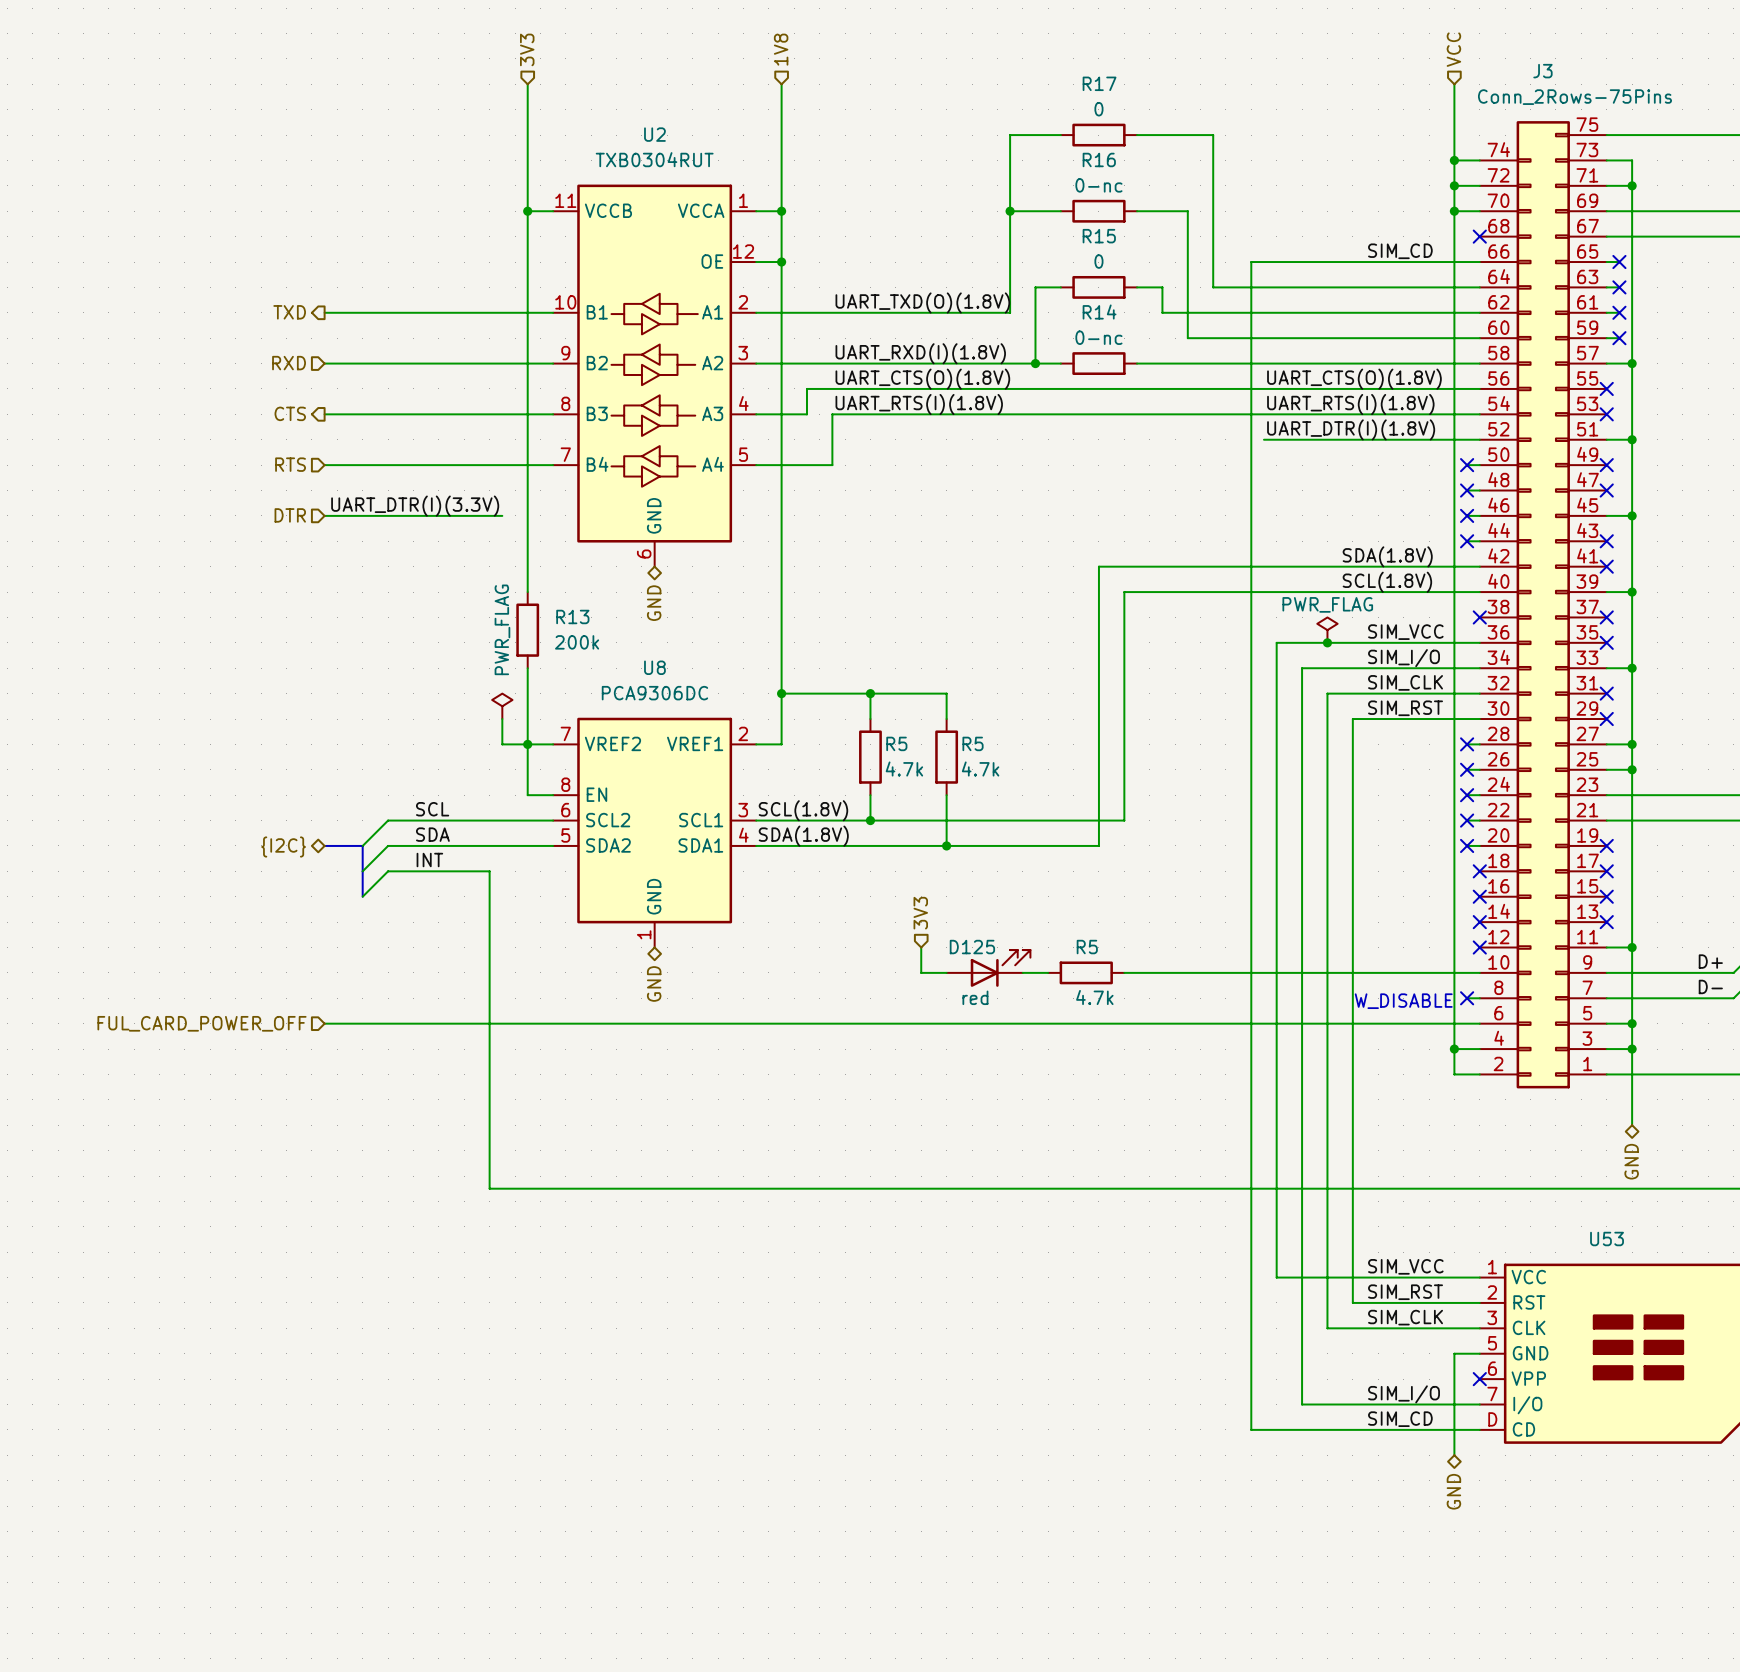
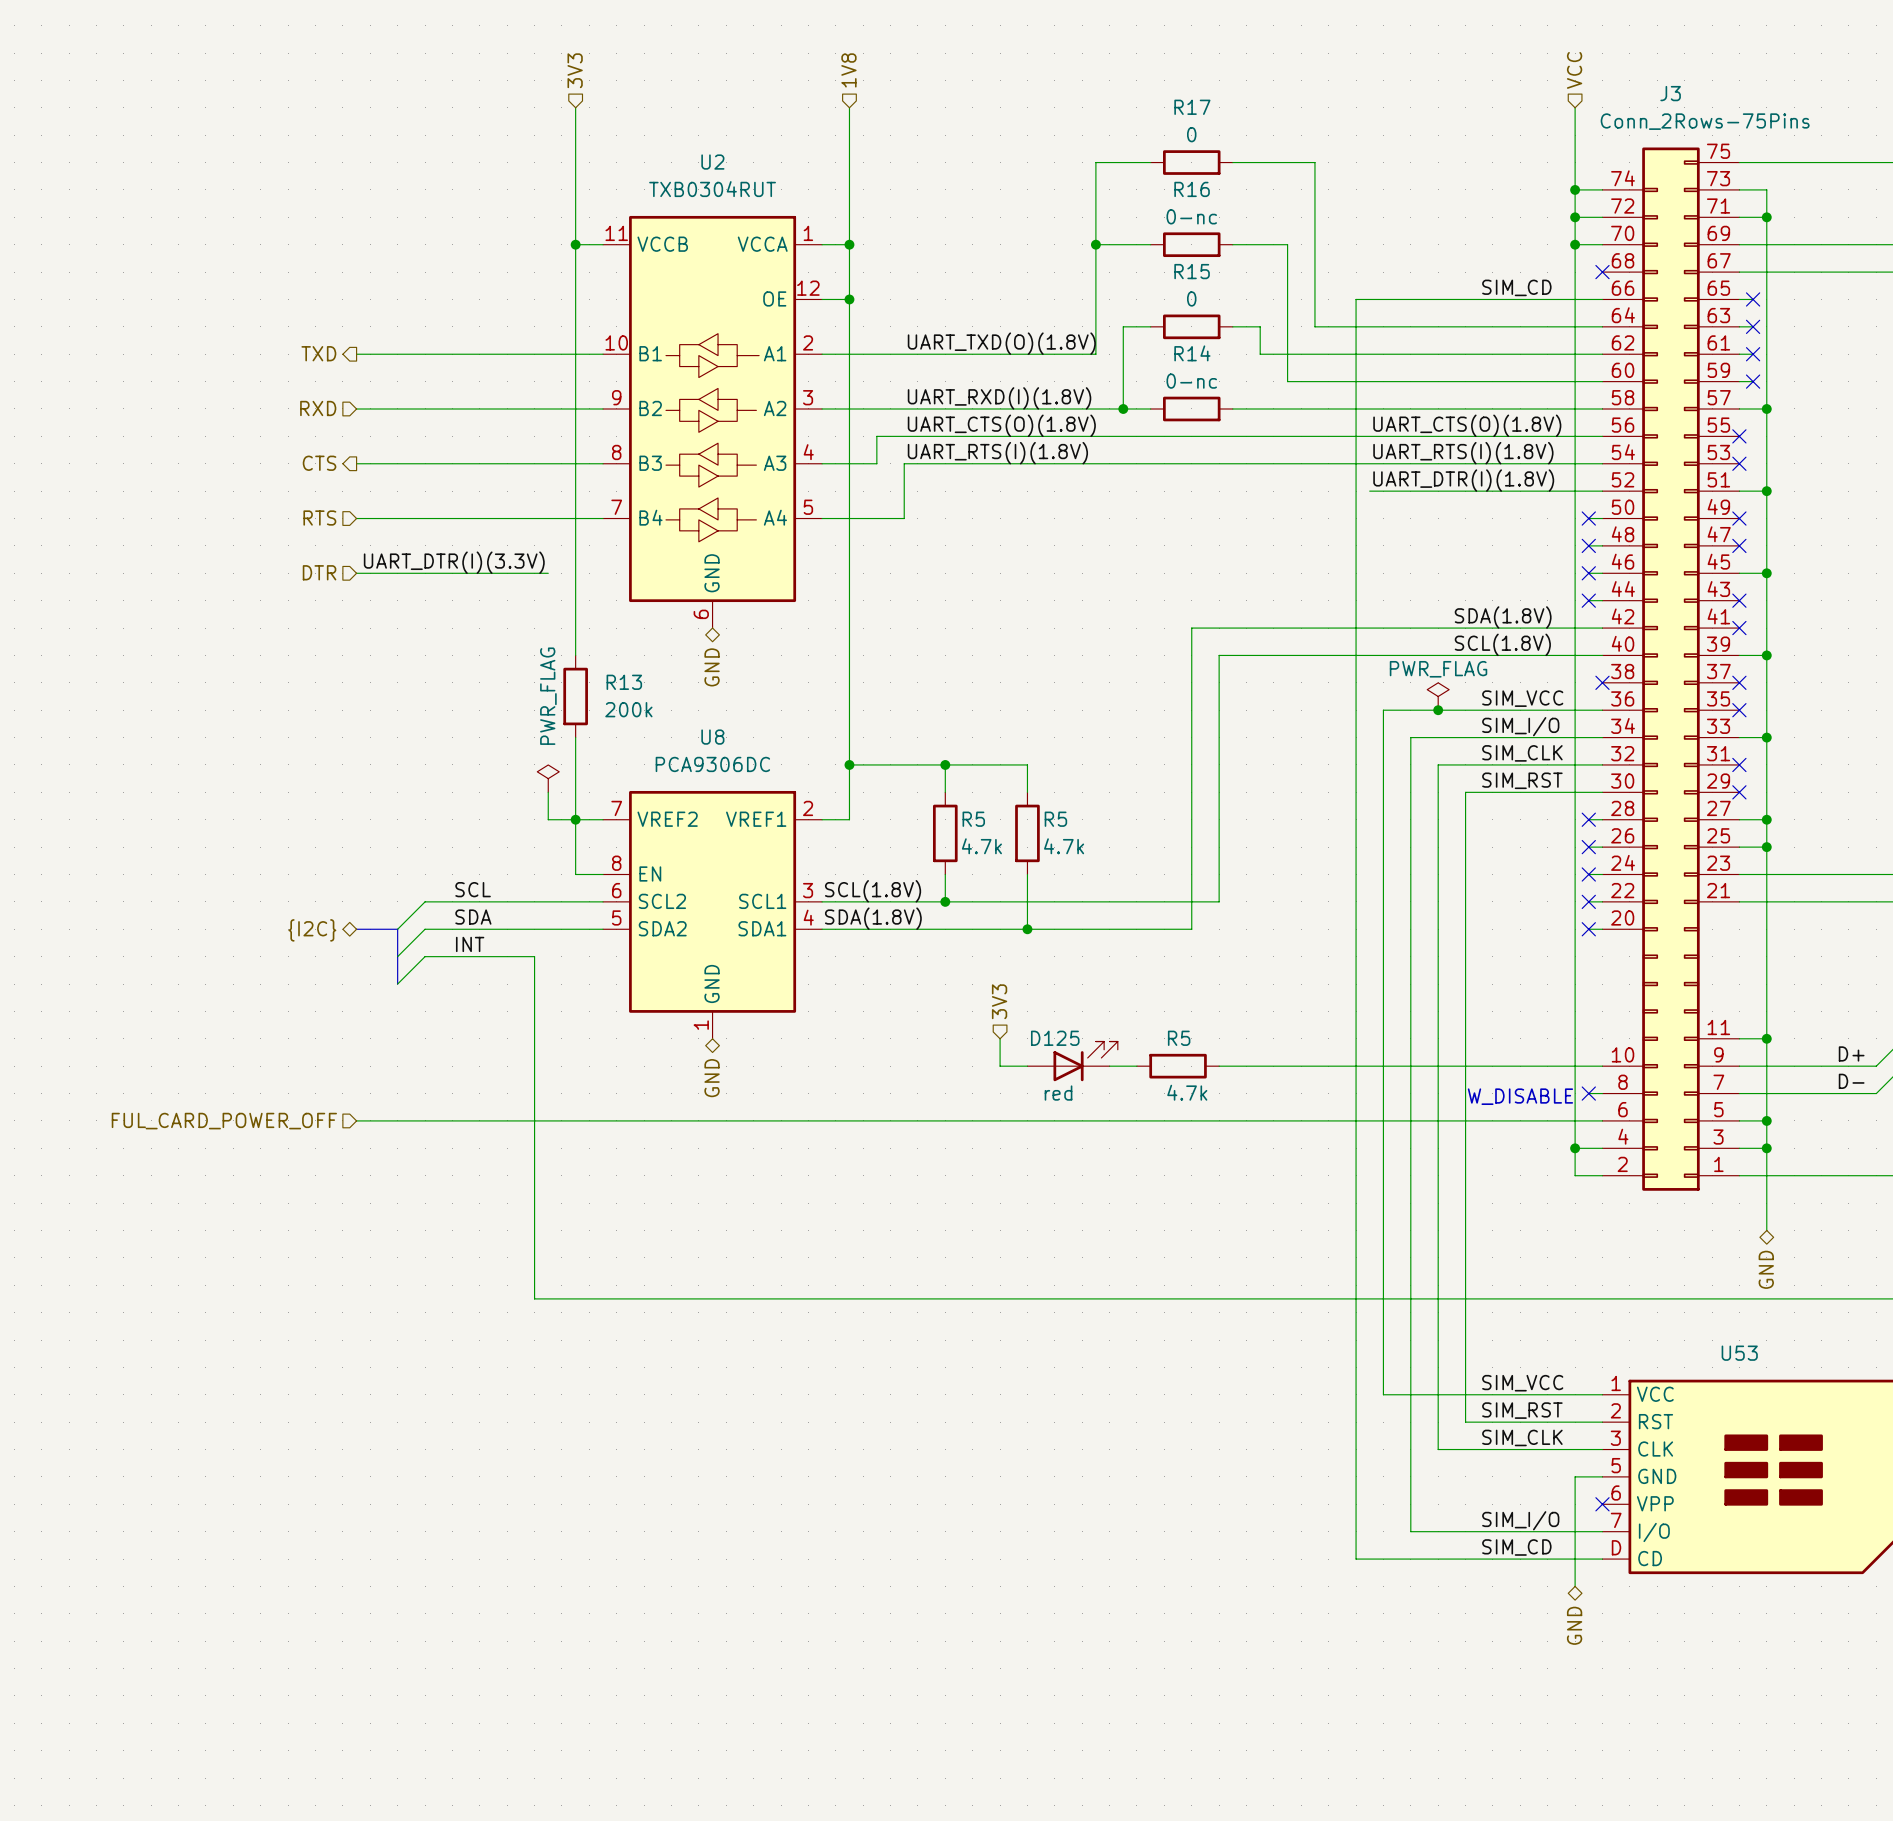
J3 symbol: [1479, 121, 1607, 1089] -> [1602, 147, 1740, 1191]
no-connect mark: (1606, 845) -> none
no-connect mark: (1479, 871) -> none
no-connect mark: (1606, 871) -> none
no-connect mark: (1479, 896) -> none
no-connect mark: (1606, 896) -> none
no-connect mark: (1479, 922) -> none
no-connect mark: (1606, 922) -> none
no-connect mark: (1479, 947) -> none

